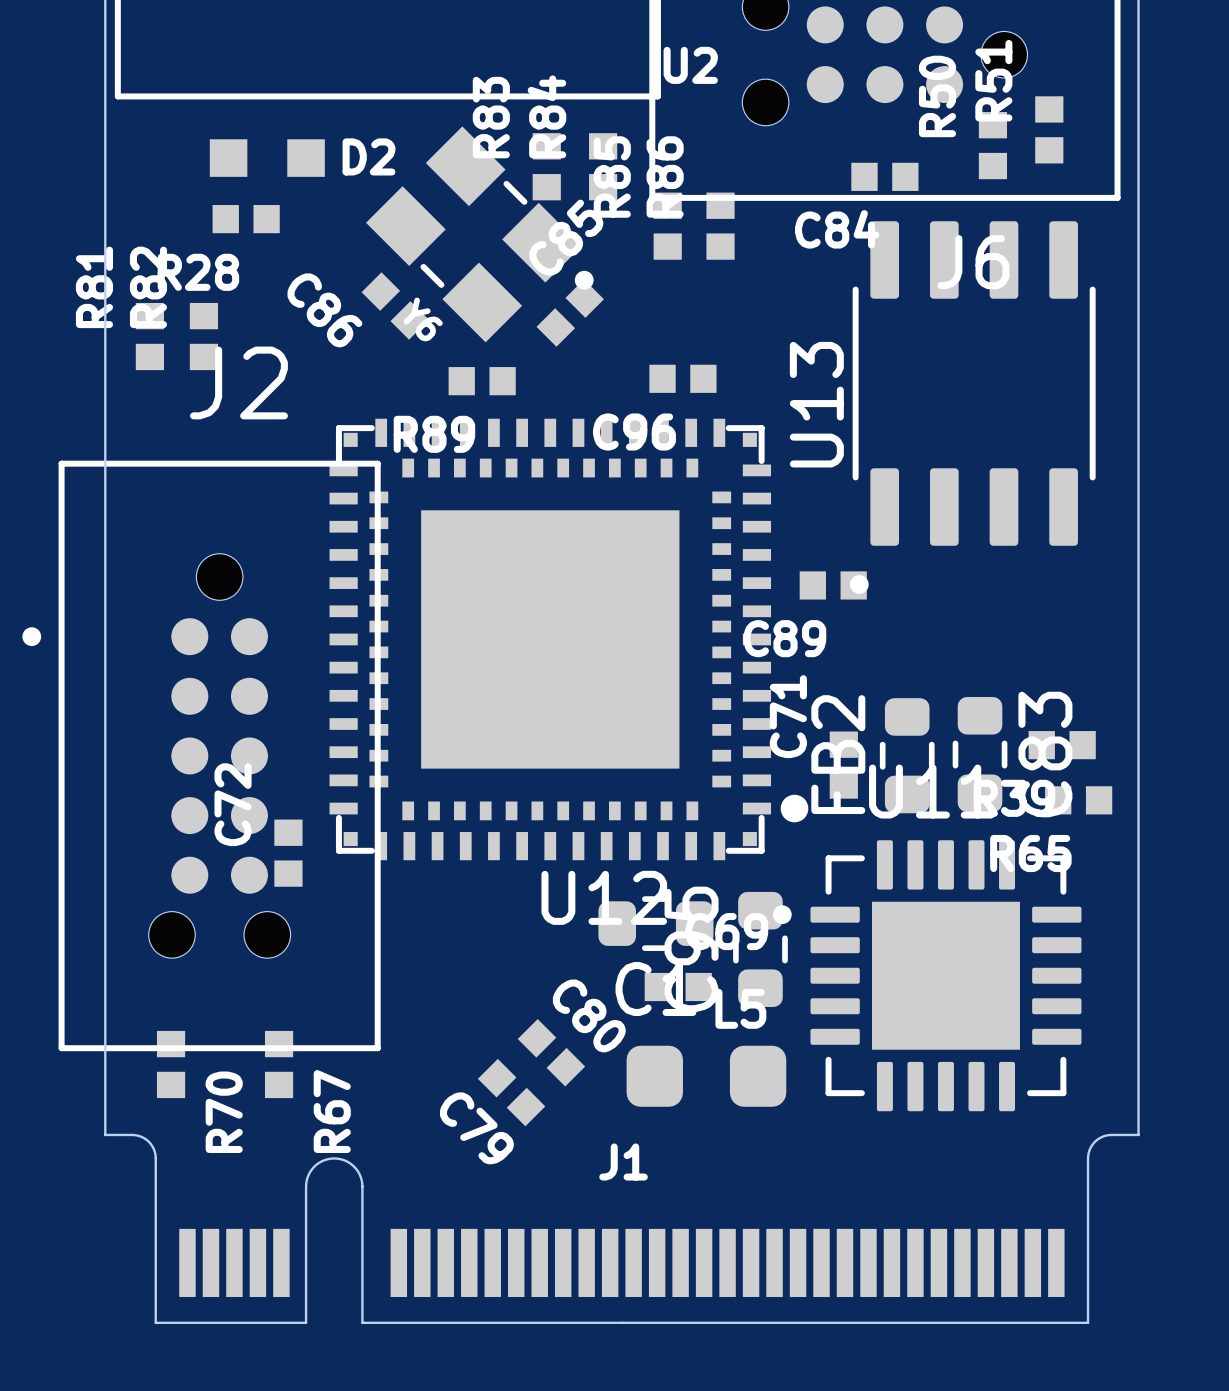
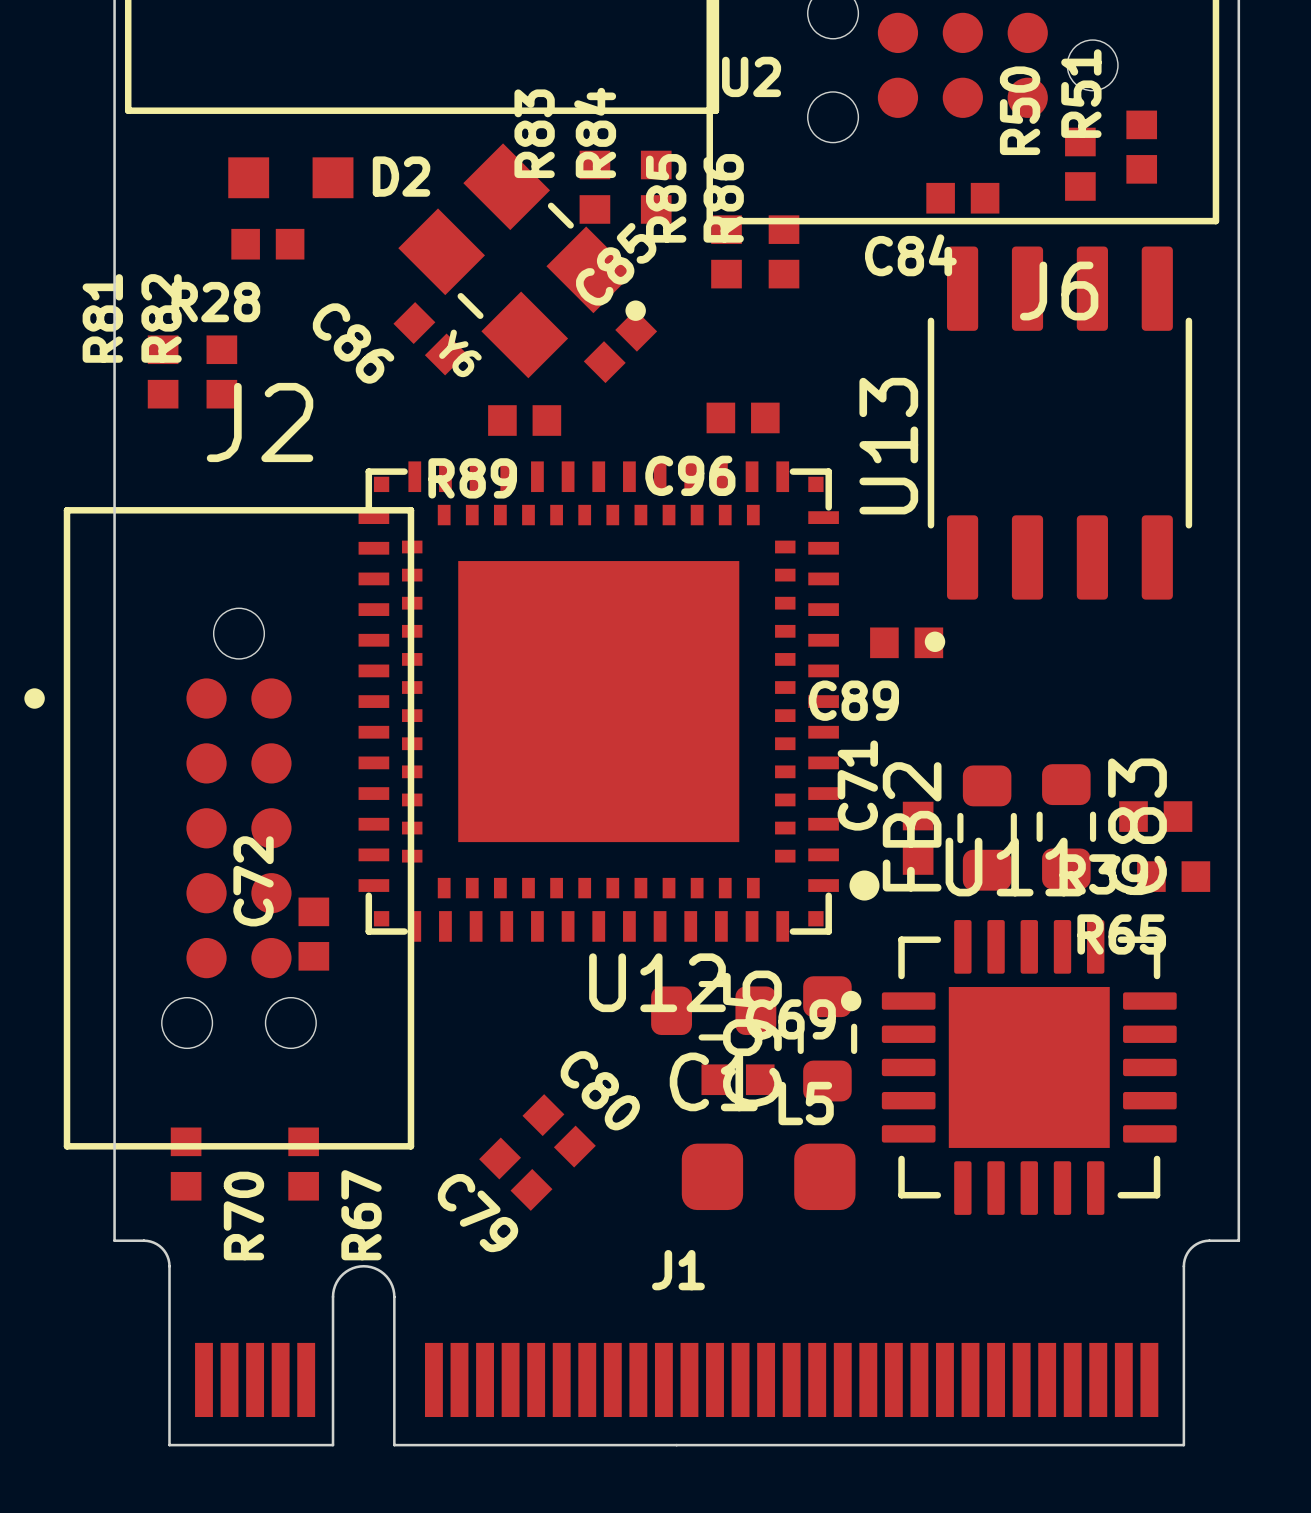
C80 position: (551, 1052) -> (559, 1130)
C79 position: (511, 1092) -> (515, 1174)

